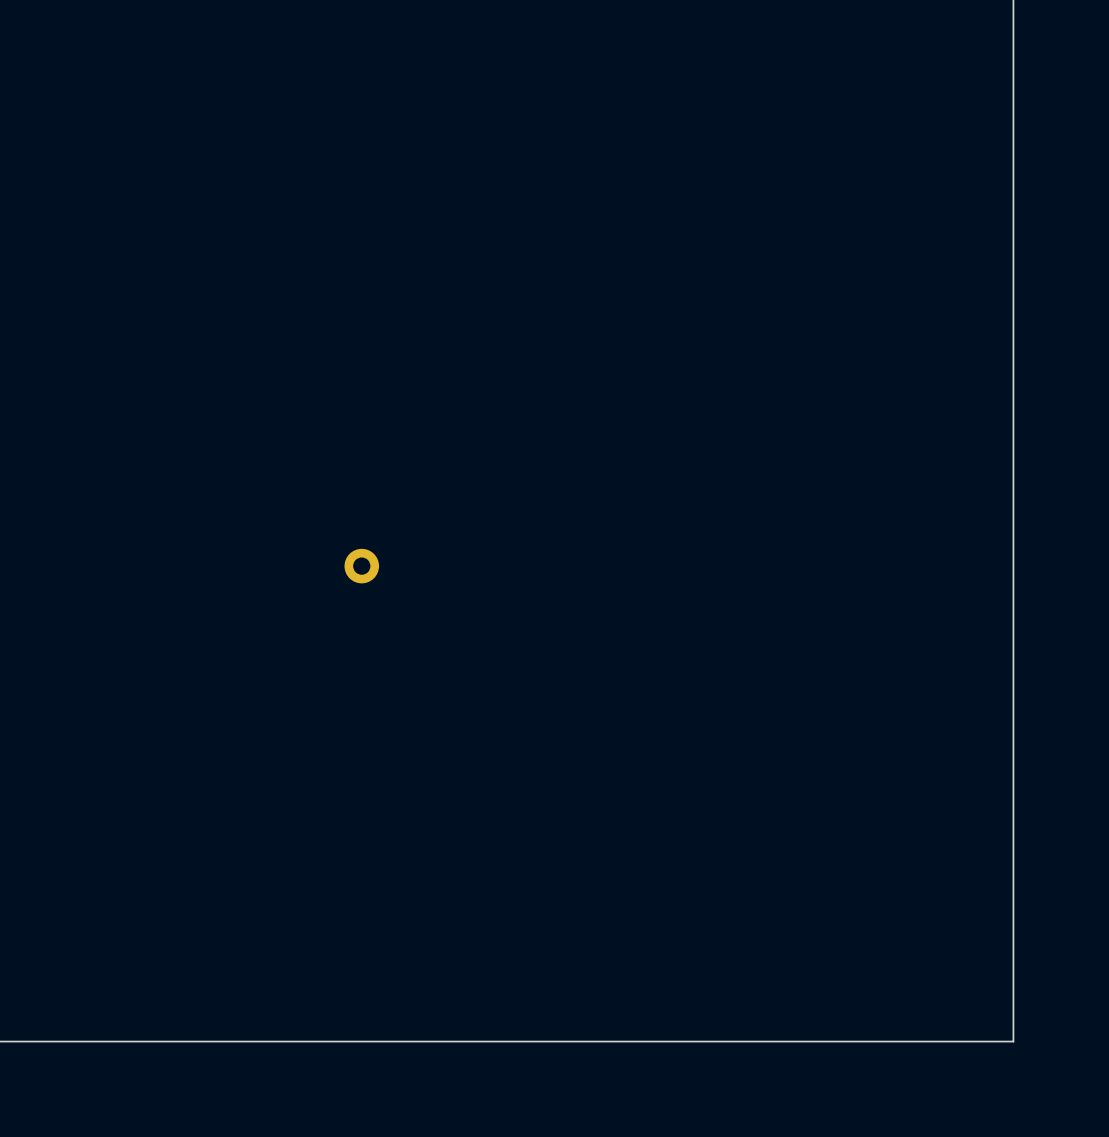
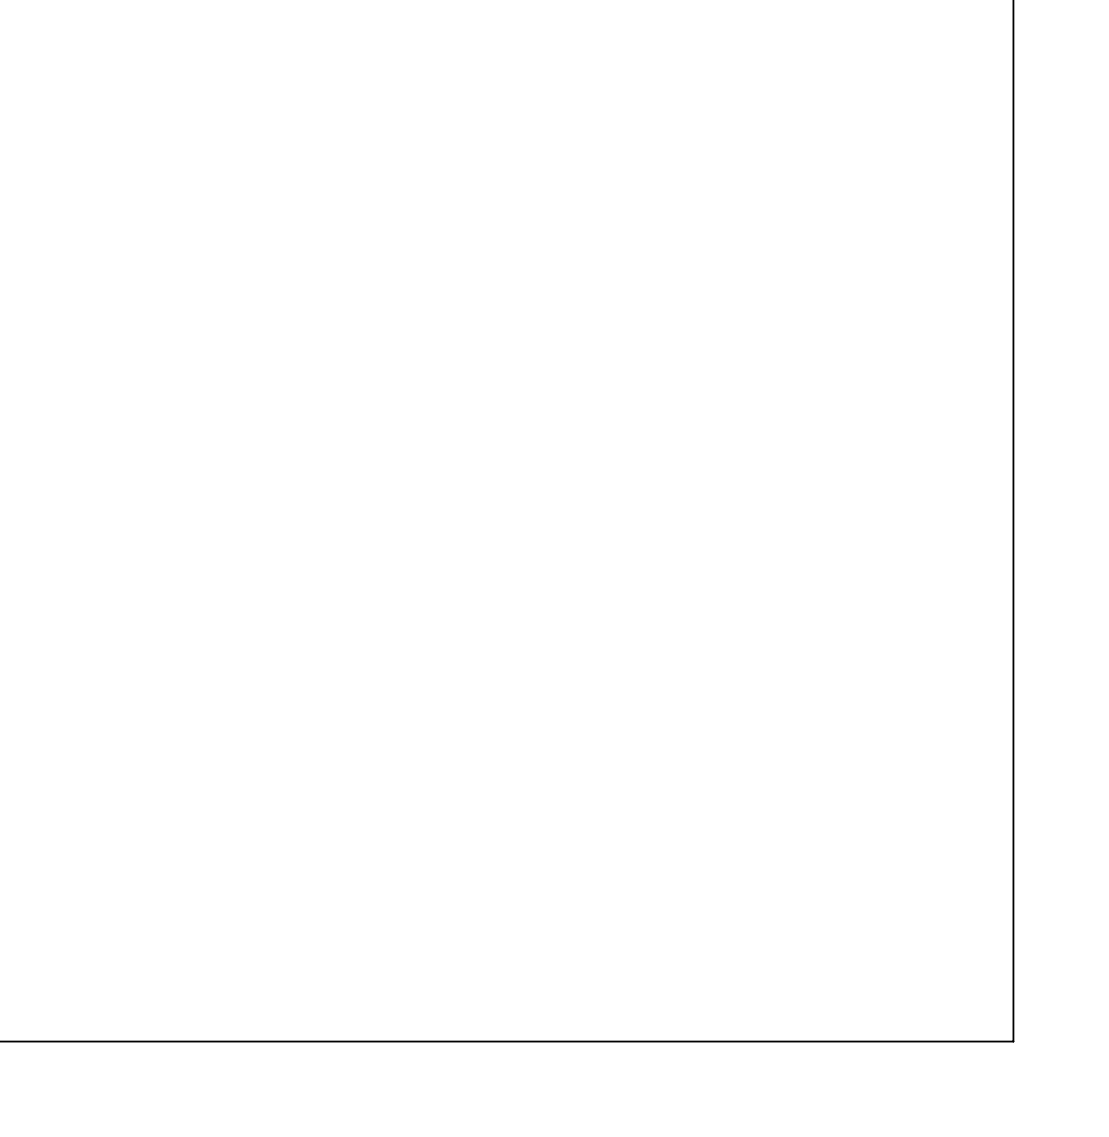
part: (361, 566) -> none

